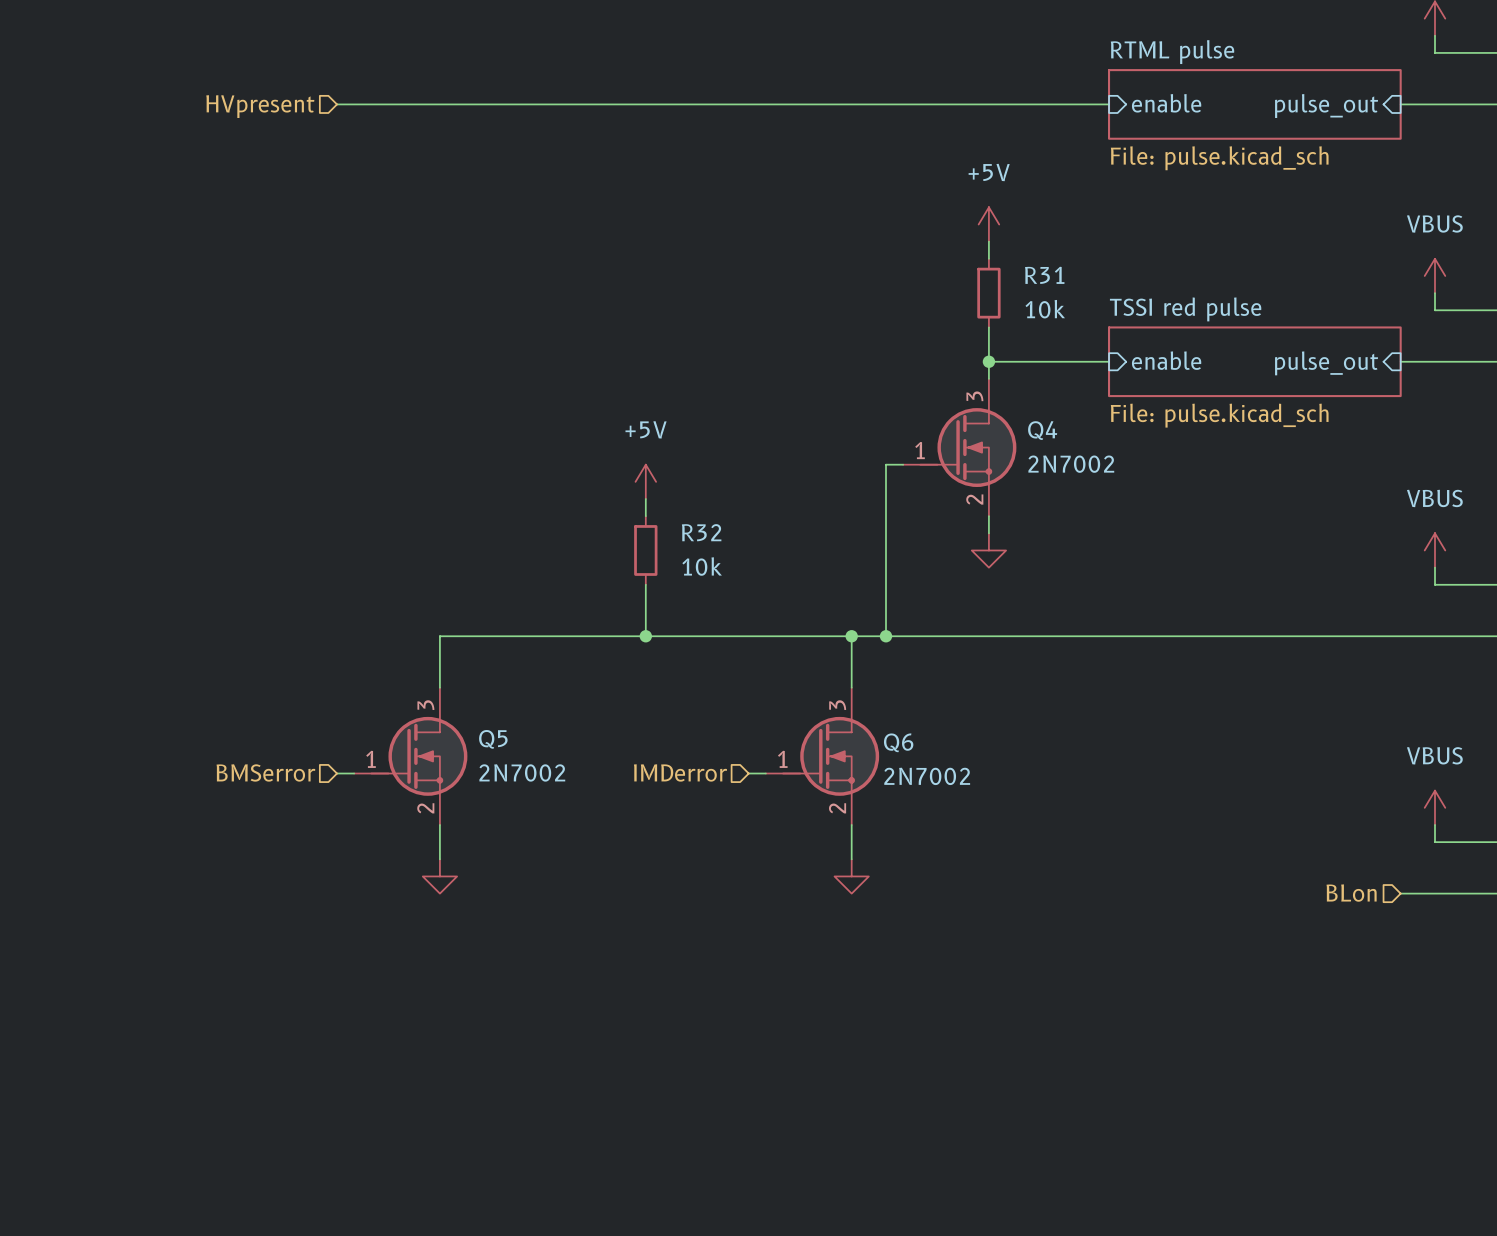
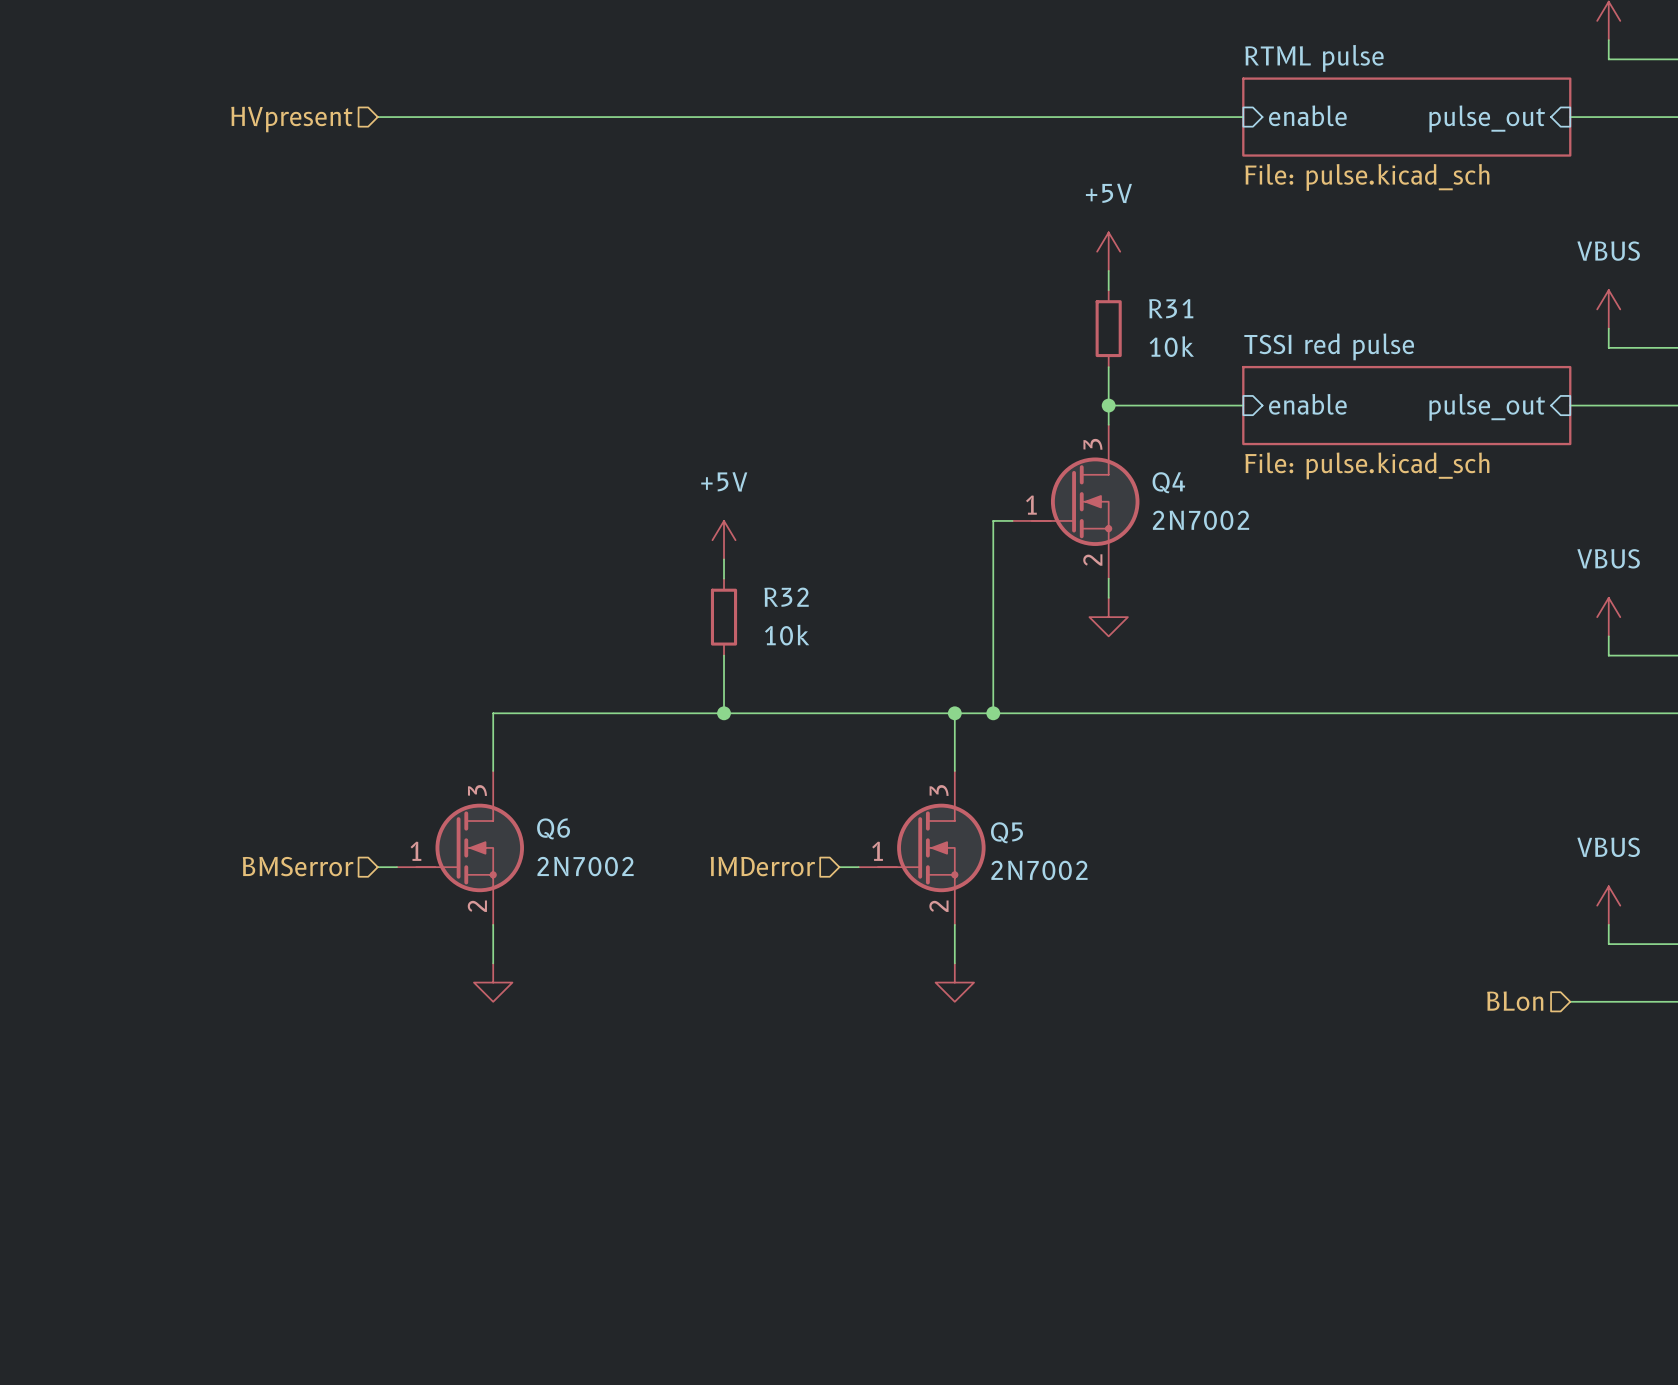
Q5 name: Q5 (493, 739) -> Q6 (553, 828)
Q6 name: Q6 (898, 742) -> Q5 (1006, 832)

